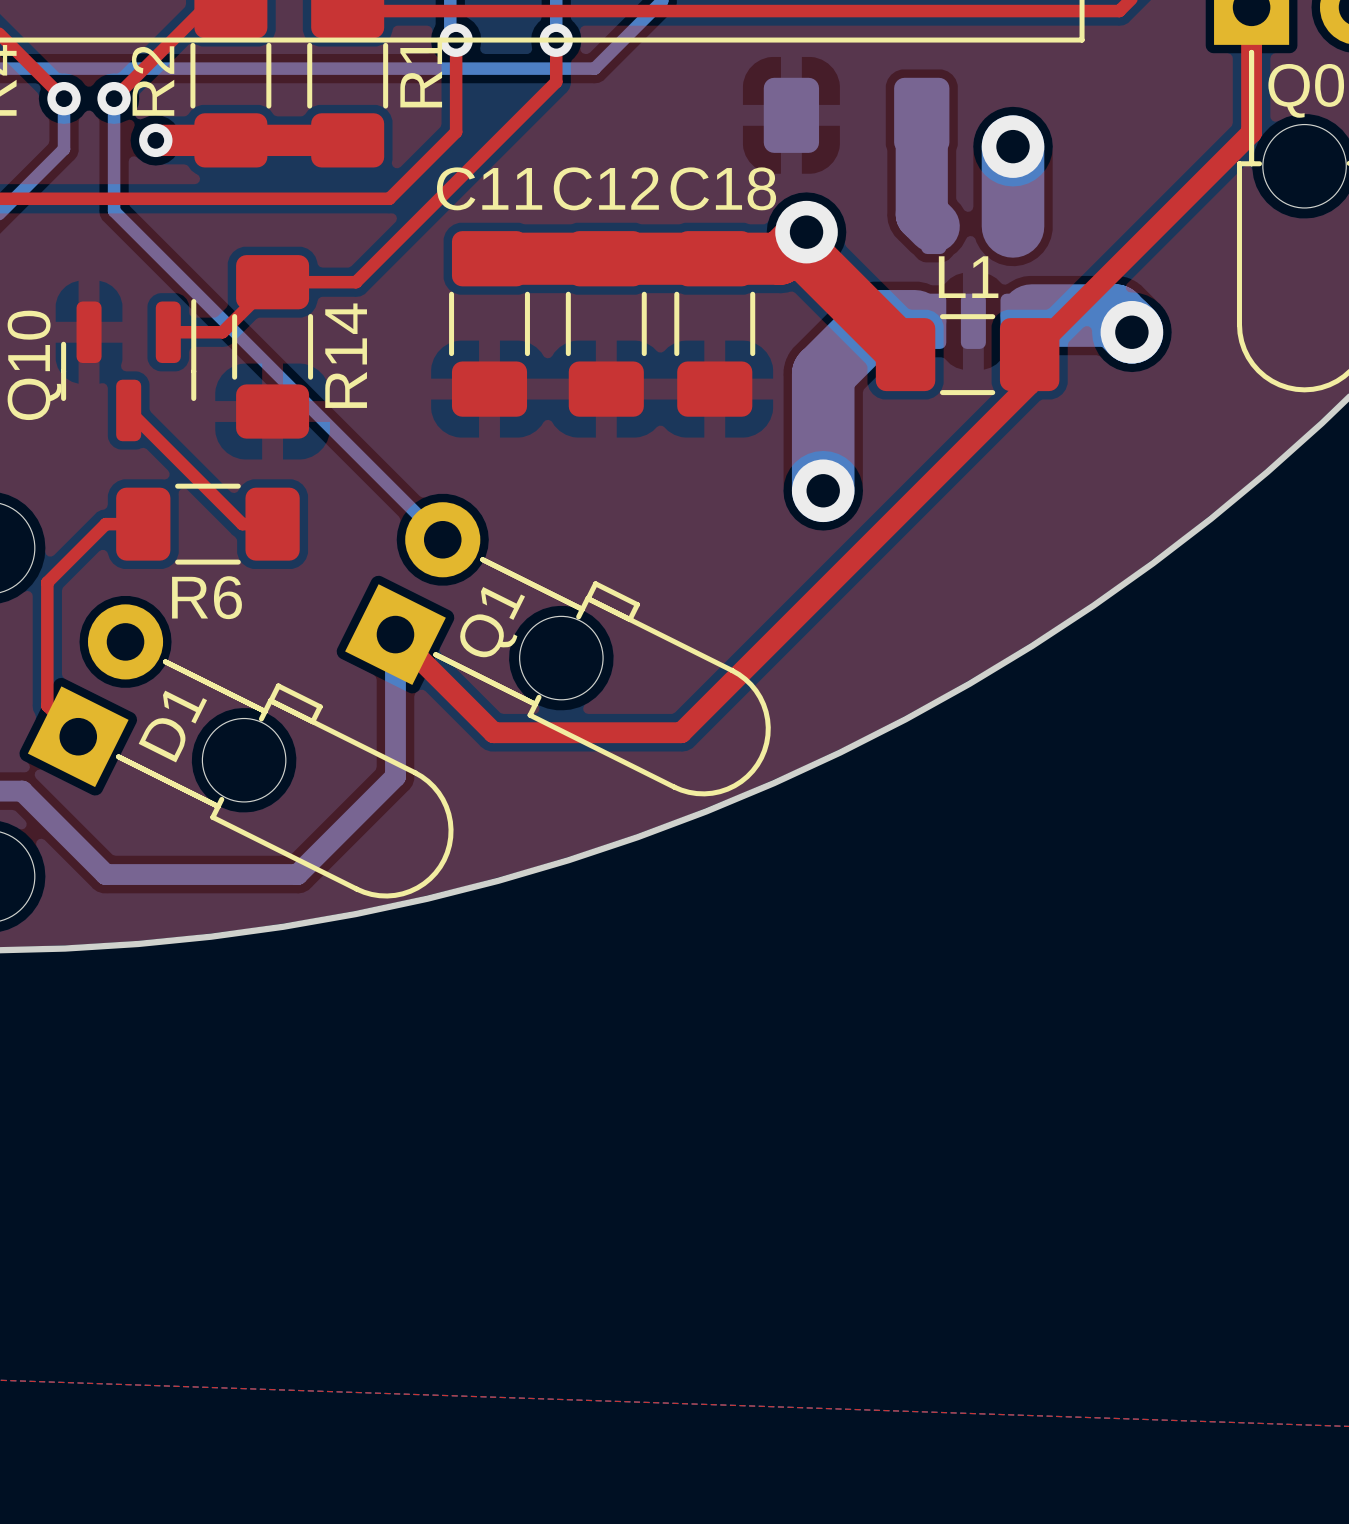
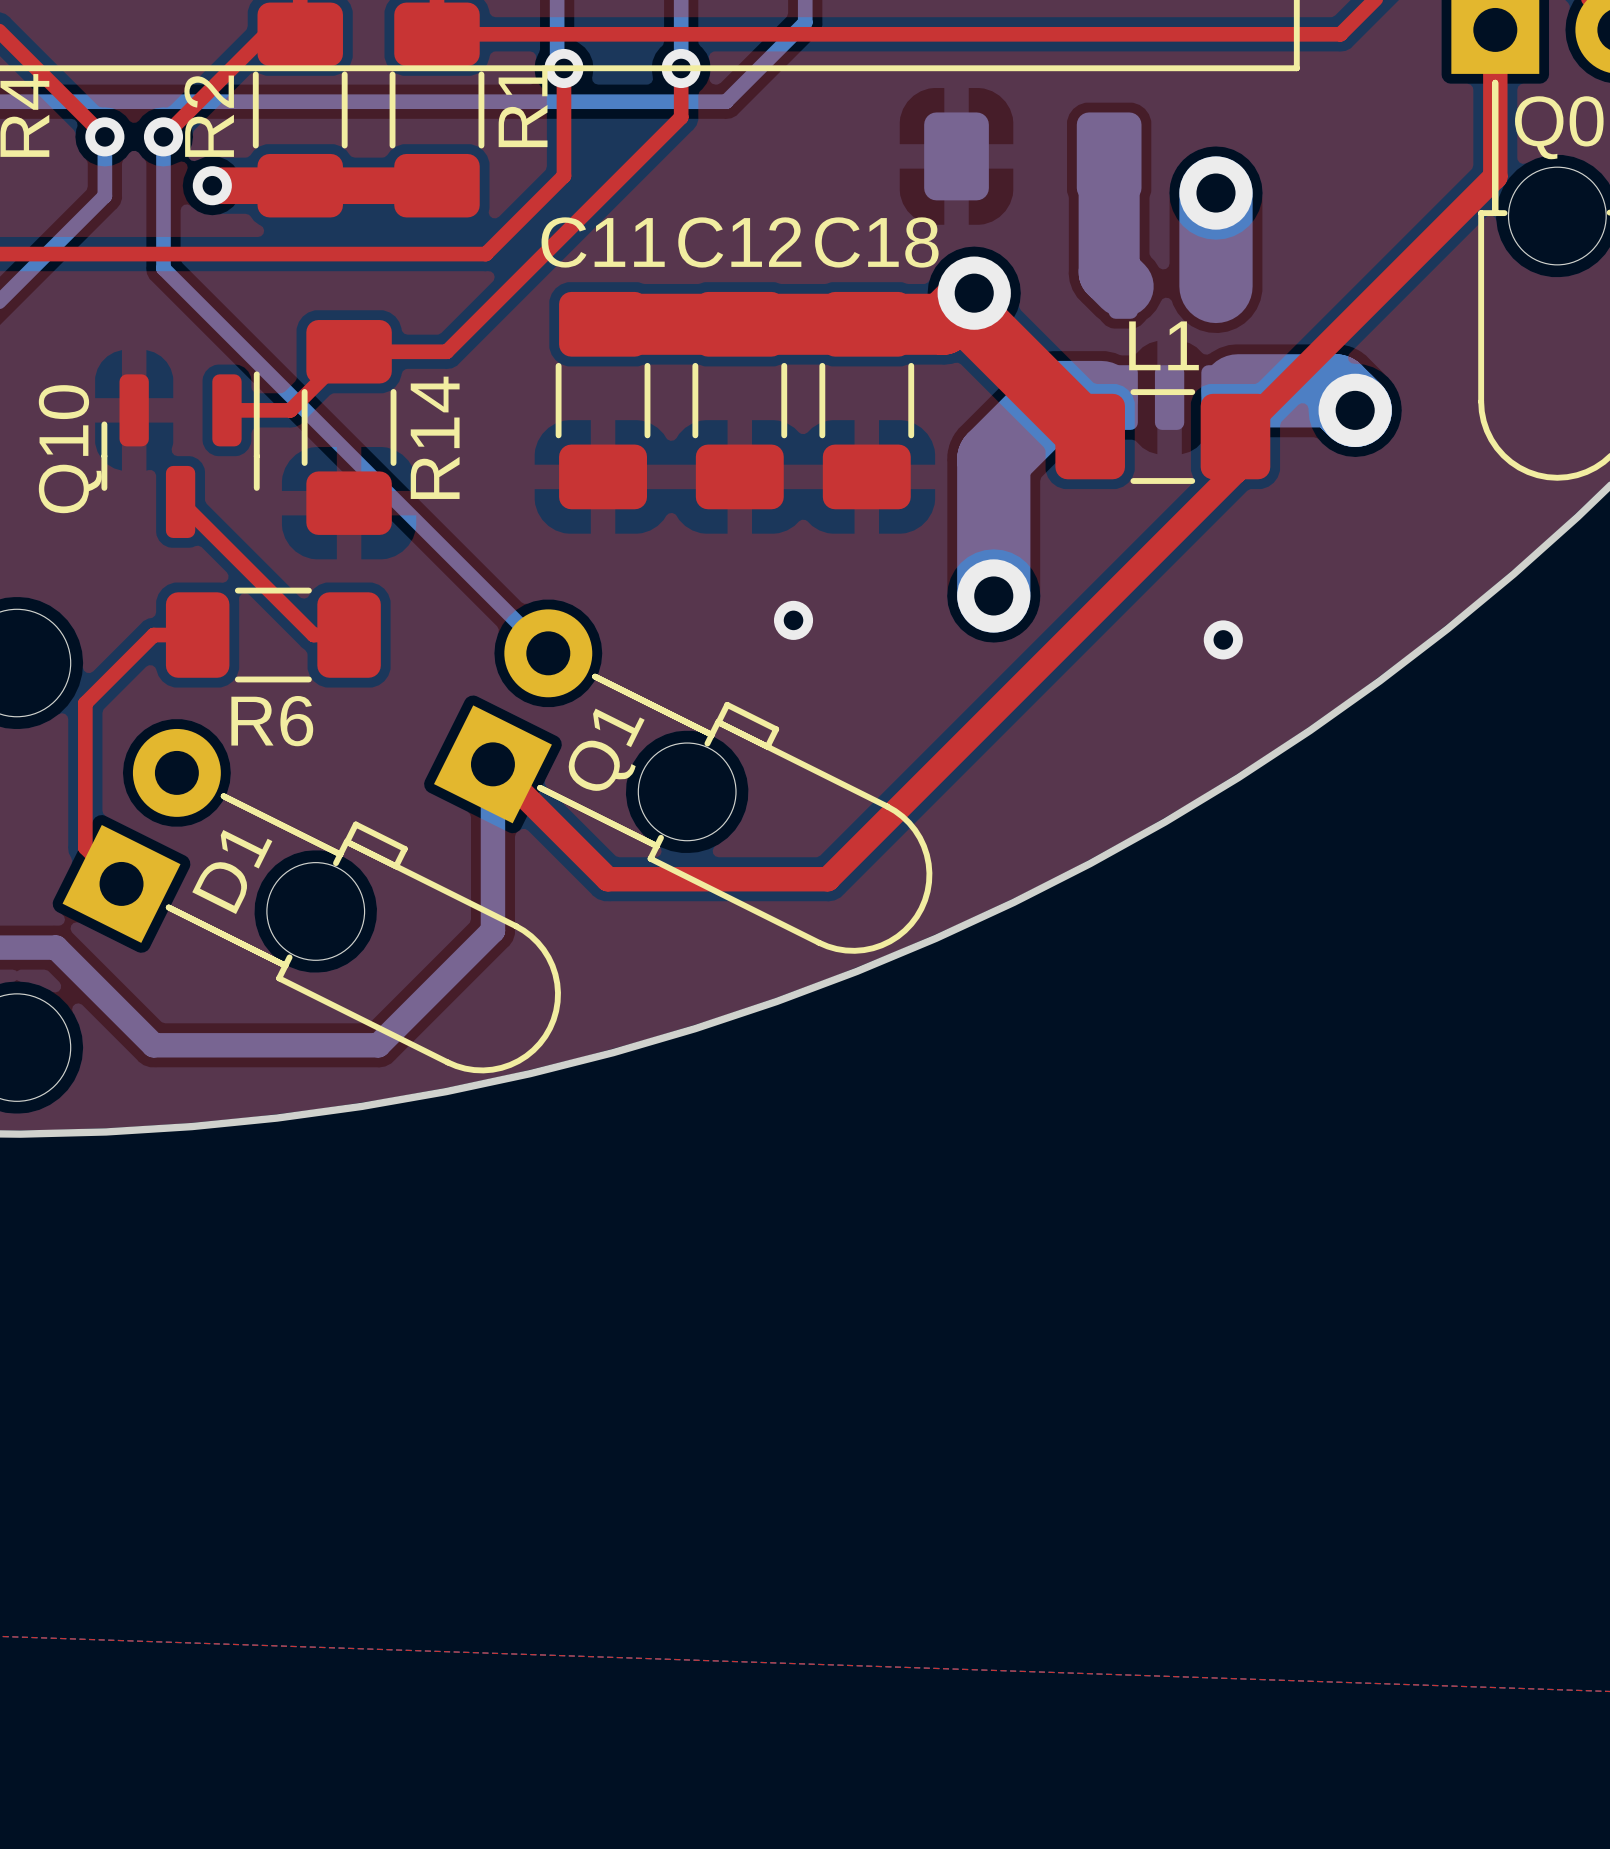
via: none -> (793, 620)
via: none -> (1223, 639)

